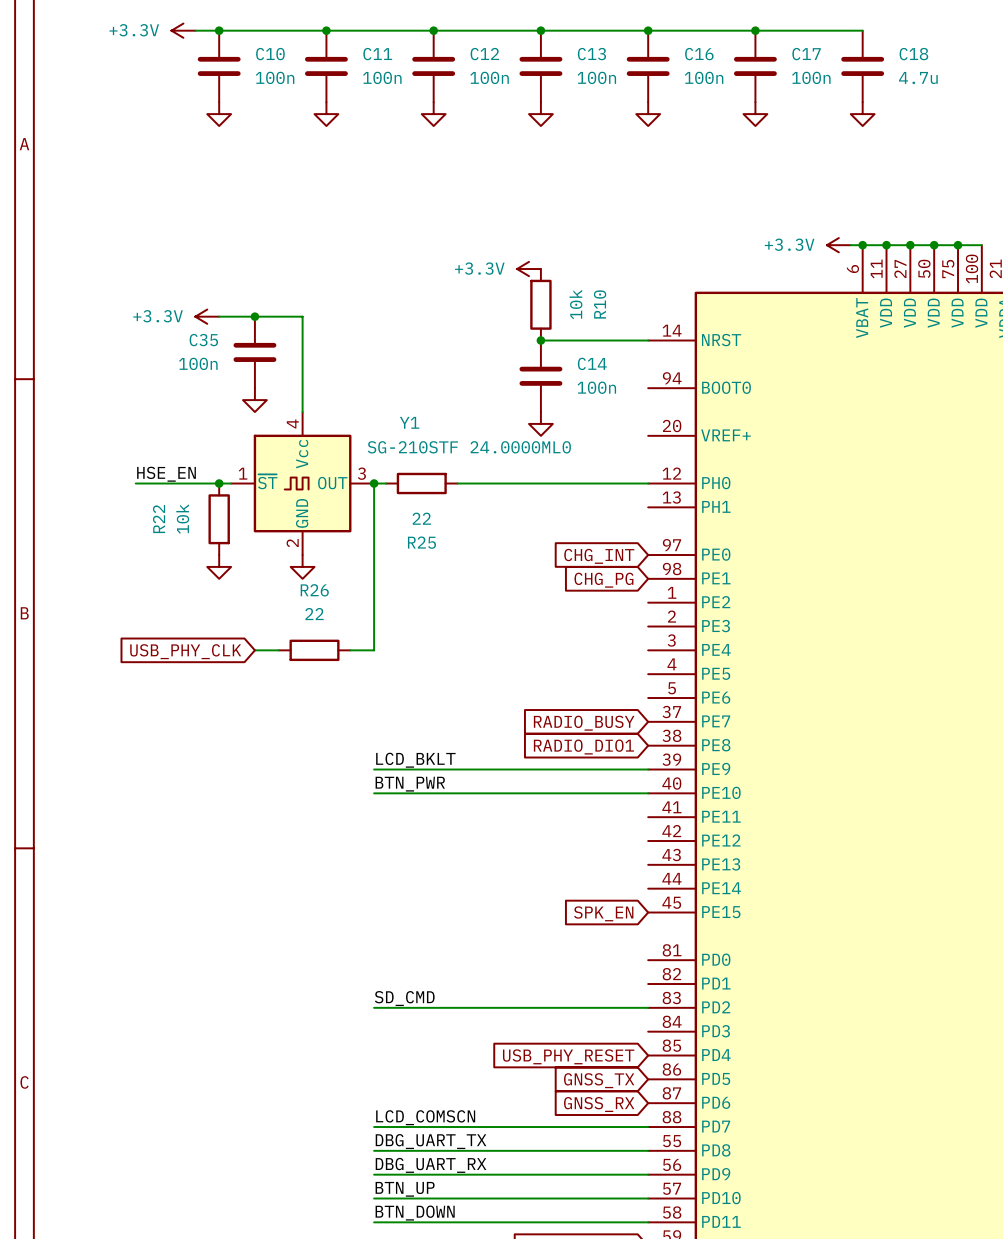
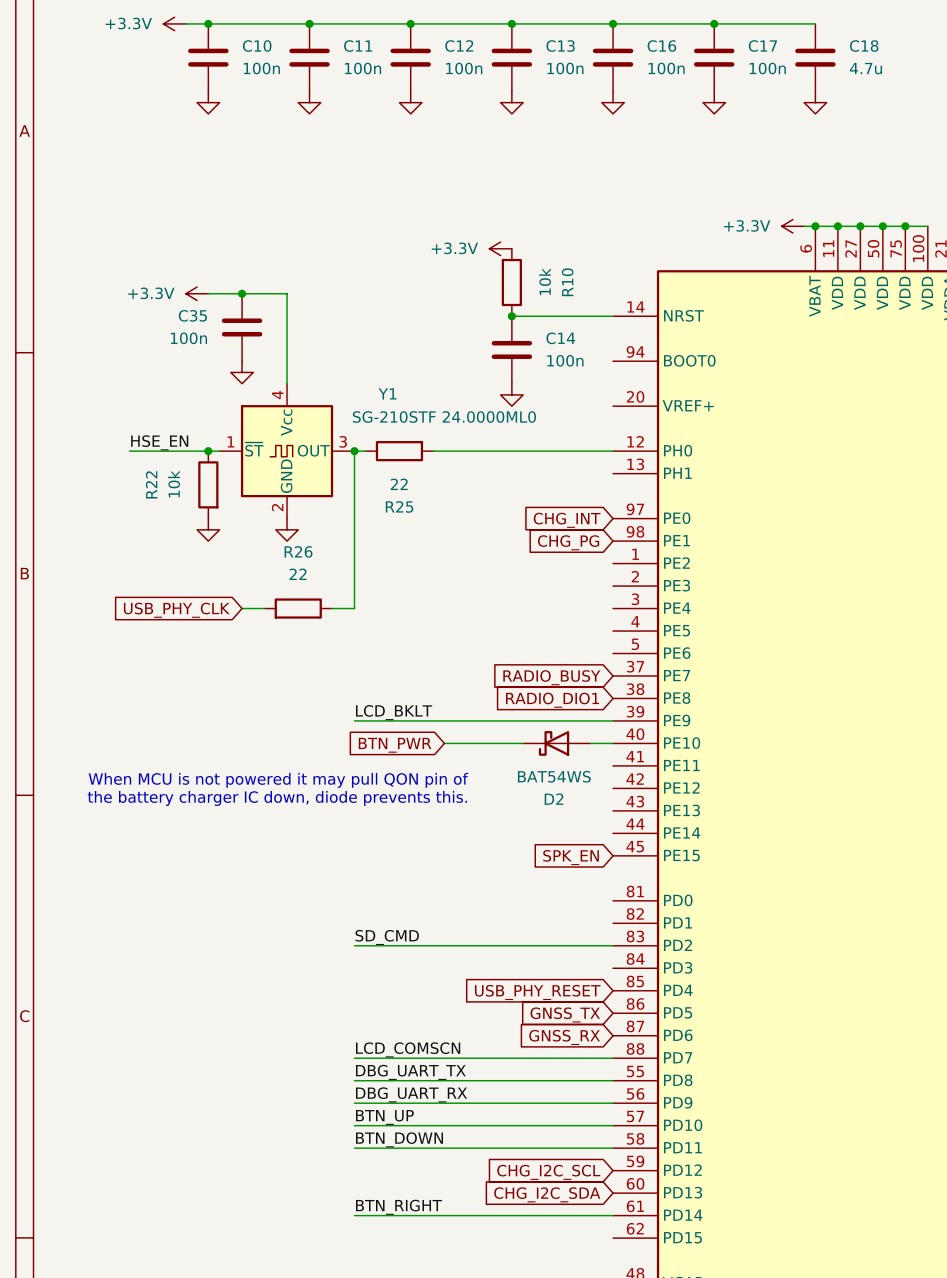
label: BTN_PWR (410, 784) -> none
wire: (374, 793) (469, 793) -> none
D2: none -> BAT54WS (556, 743)
global label: none -> BTN_PWR (395, 745)
text: none -> When MCU is not powered it may pull QON pin of (278, 780)
text: none -> the battery charger IC down, diode prevents this. (277, 798)

